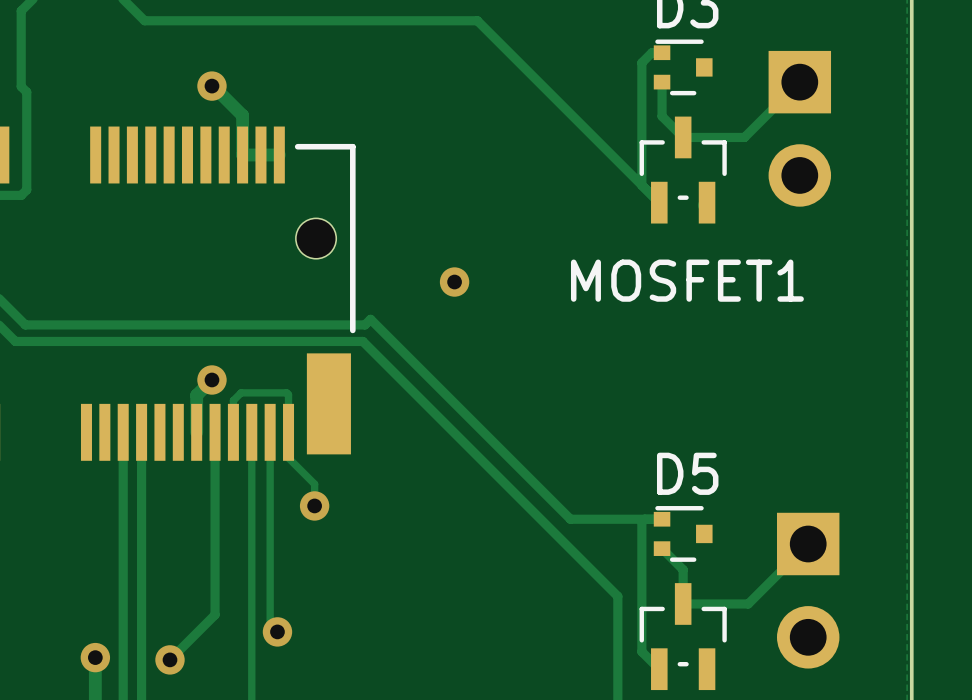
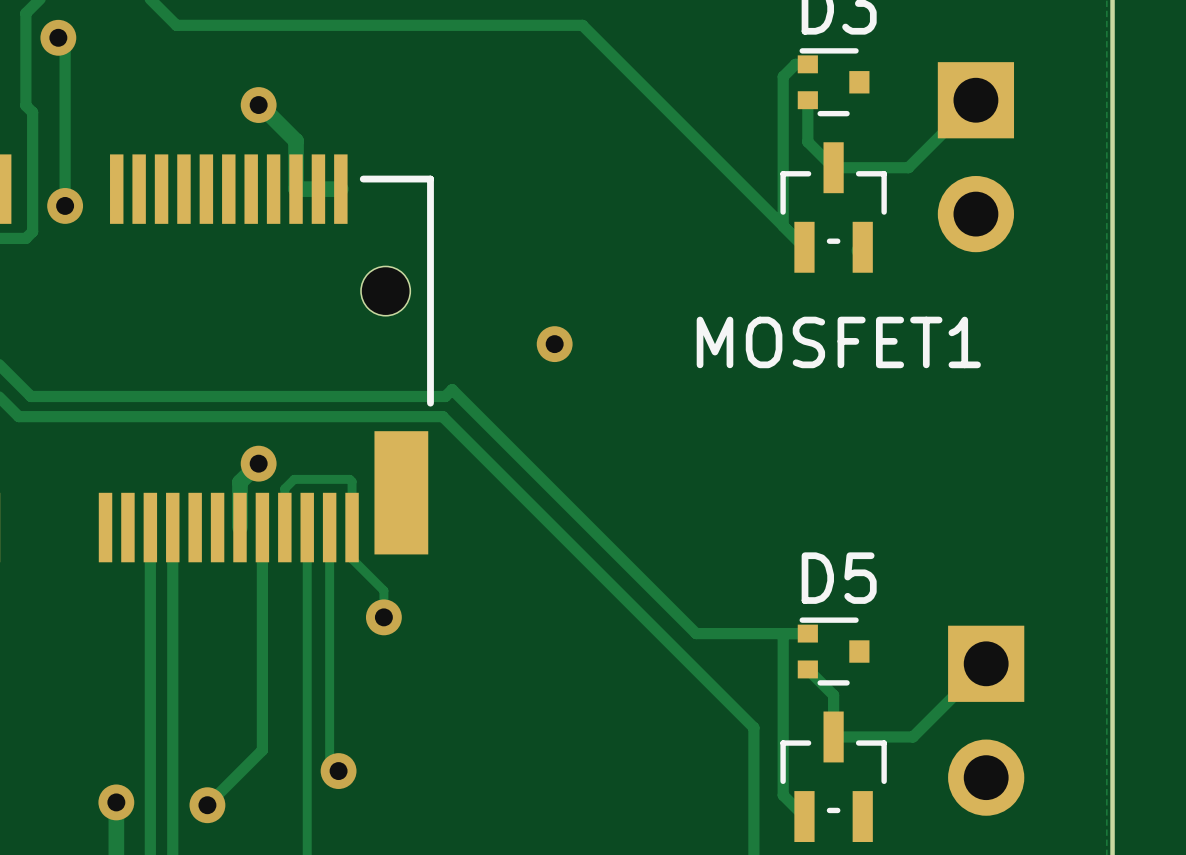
track: none -> (58, 37) (65, 44) (65, 205)
via: none -> (58, 37)
via: none -> (65, 205)

